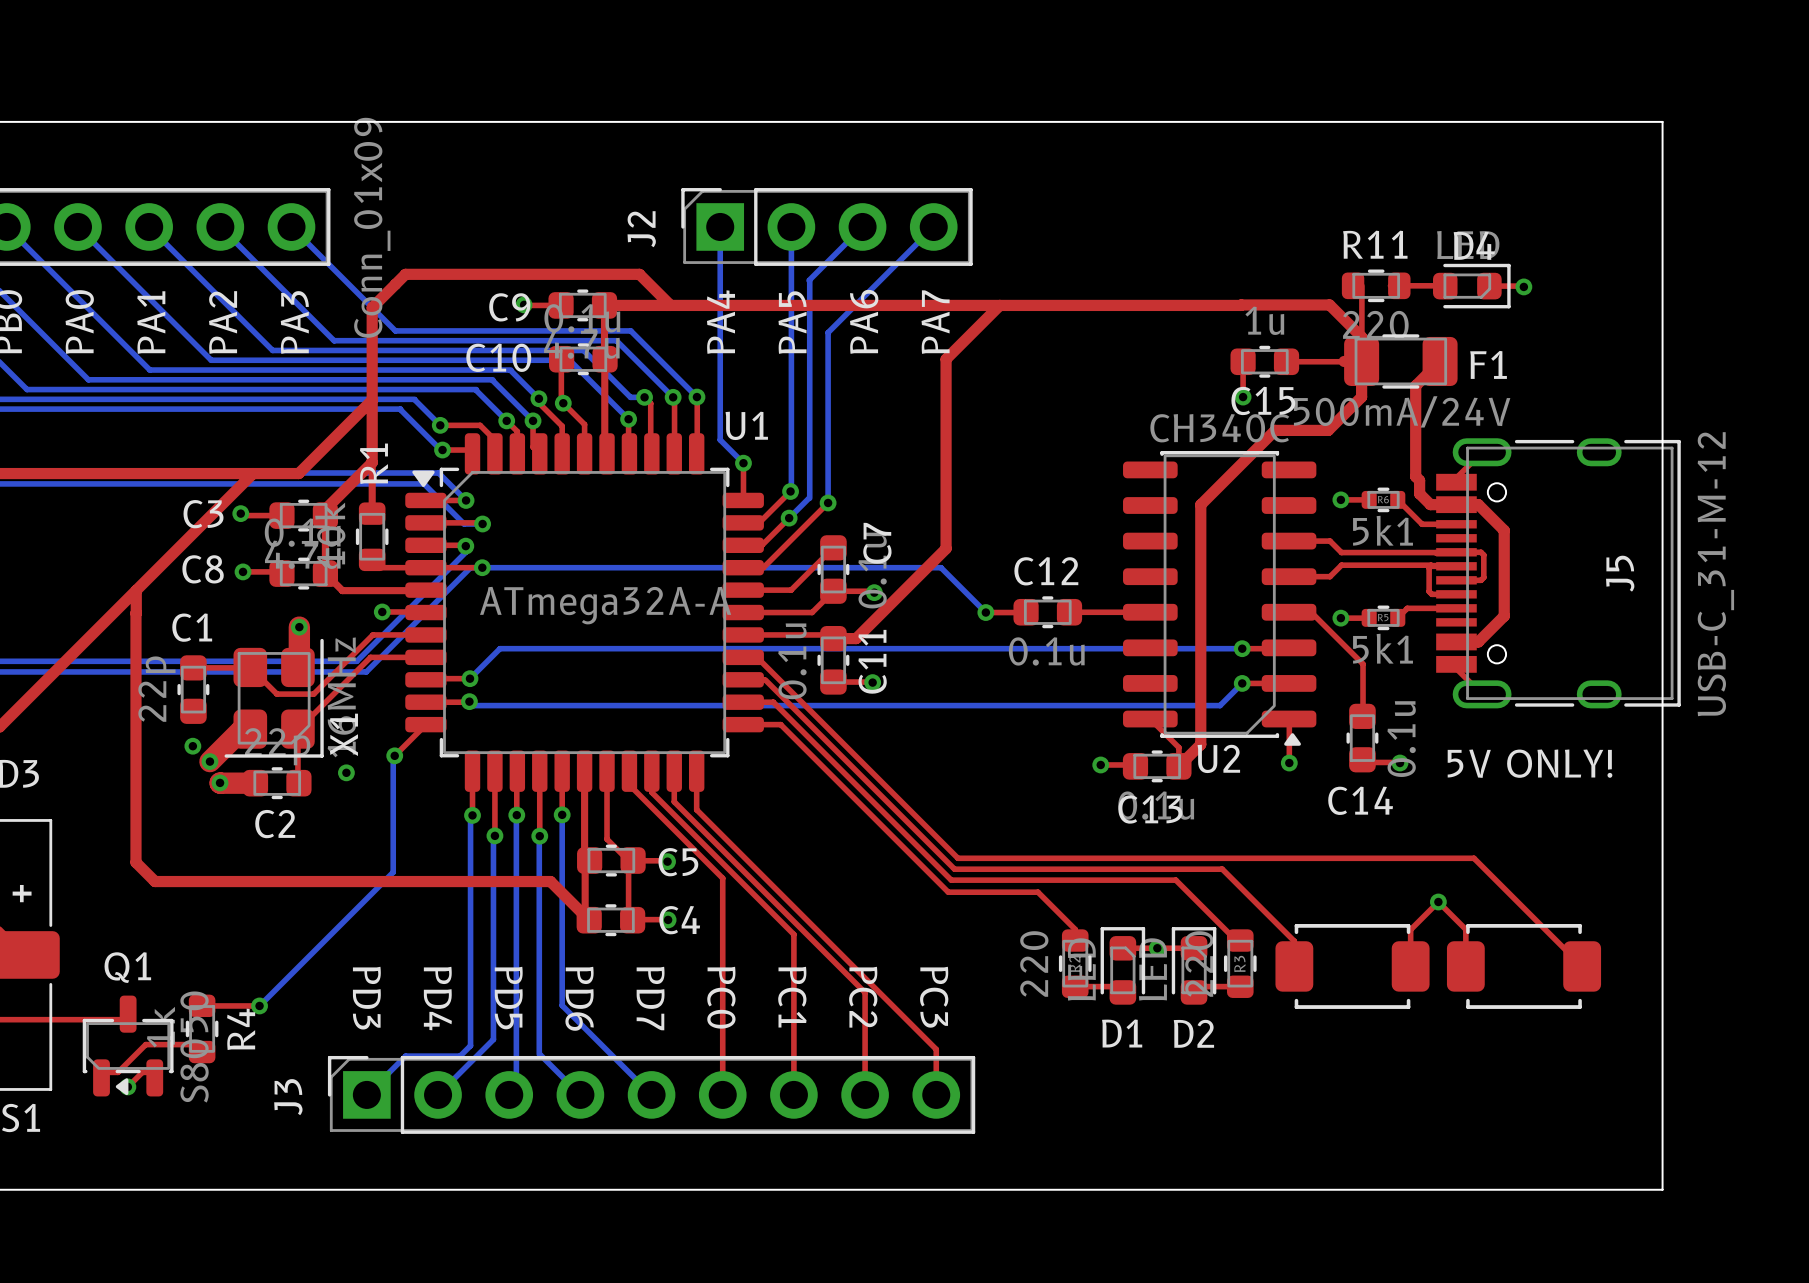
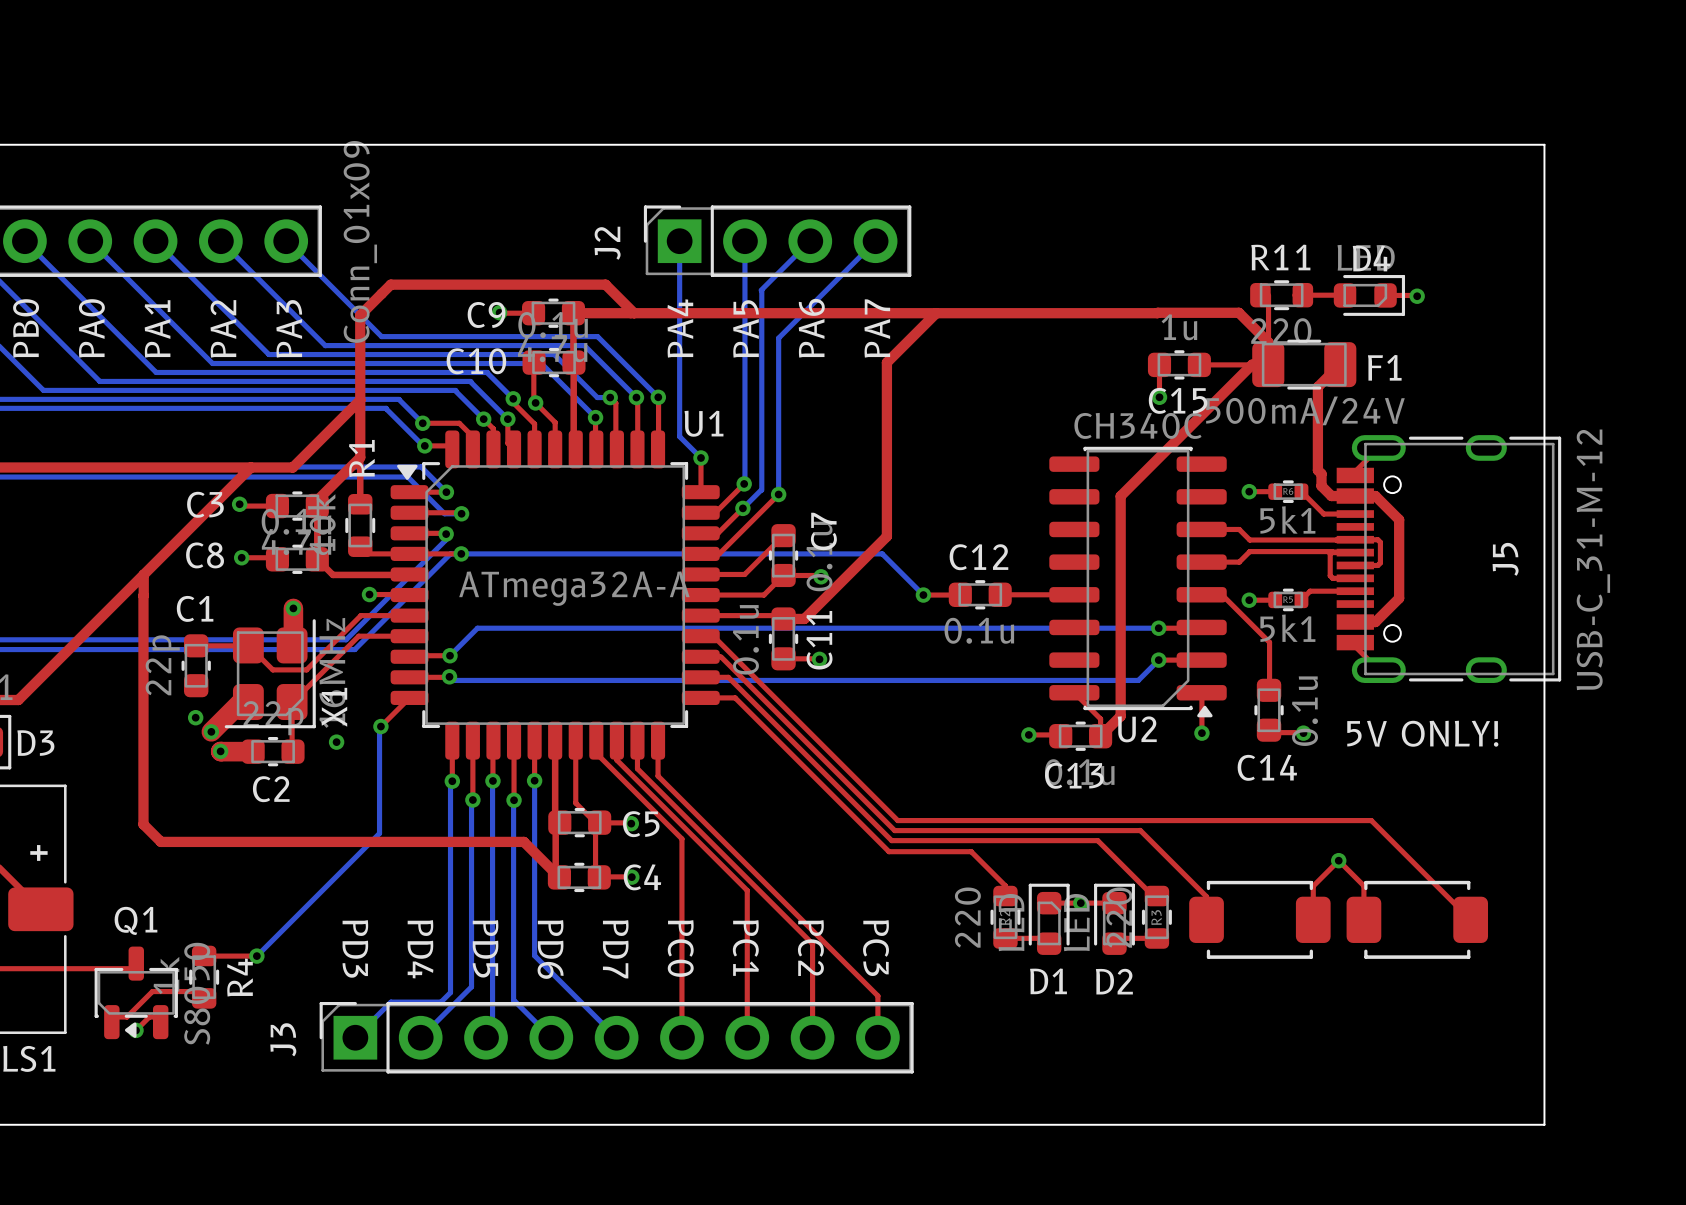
top track: (1361, 361) (1361, 397) (1328, 430) (1275, 430) -> (1252, 364) (1188, 427)

